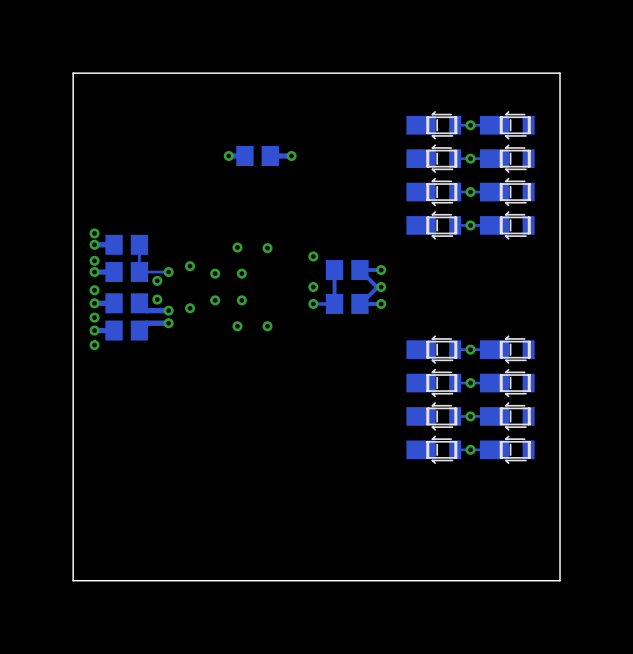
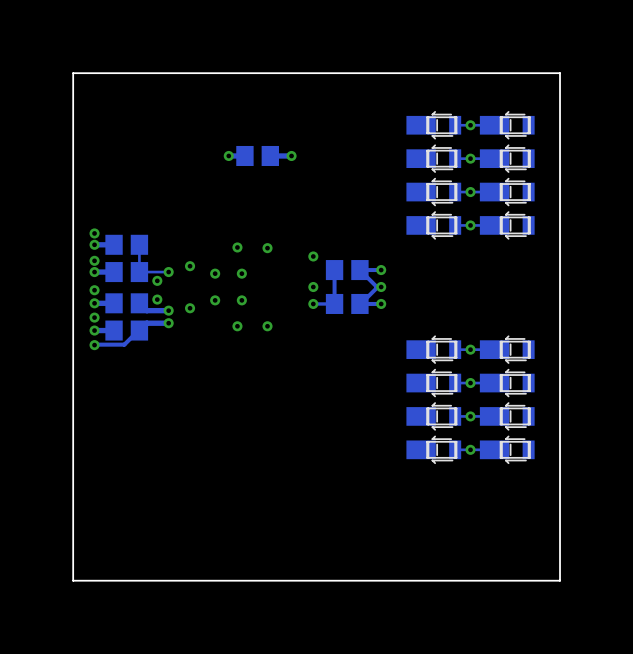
track: none -> (168, 323) (145, 323) (124, 344) (94, 345)

